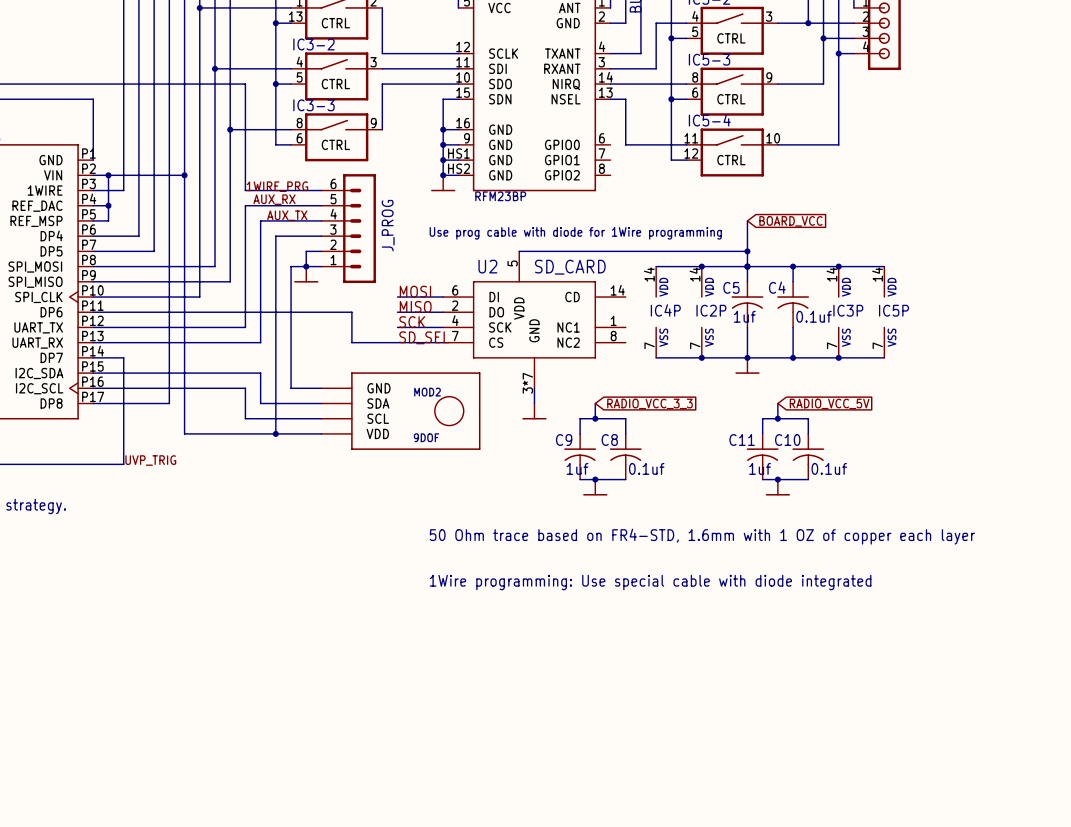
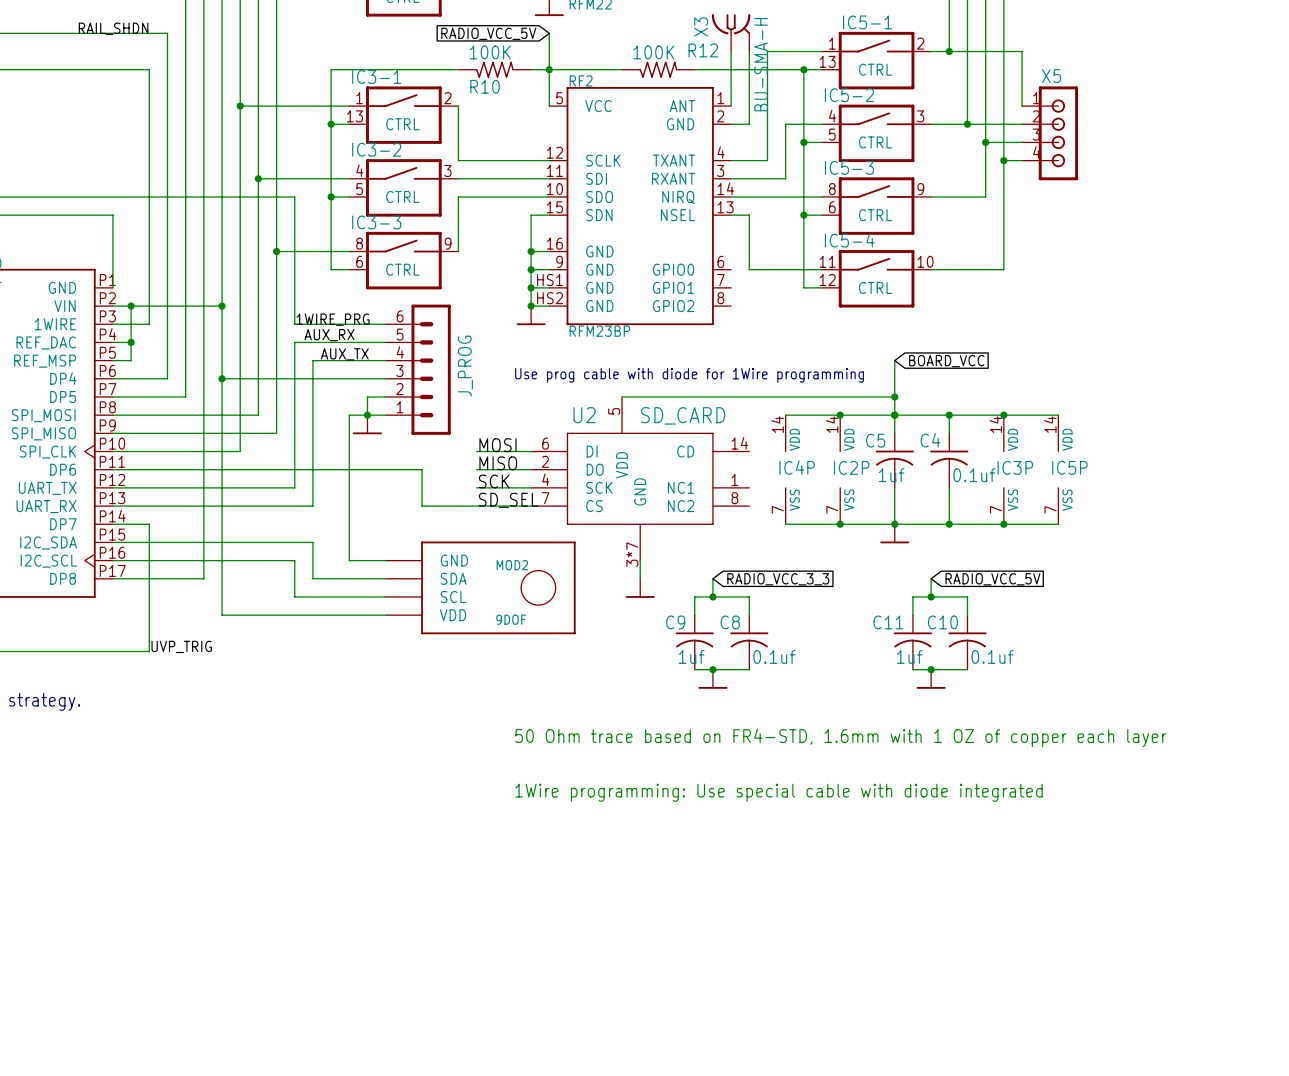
junction: none -> (222, 378)
wire: (275, 236) (275, 433) -> (331, 378) (222, 378)
junction: (275, 433) -> none

